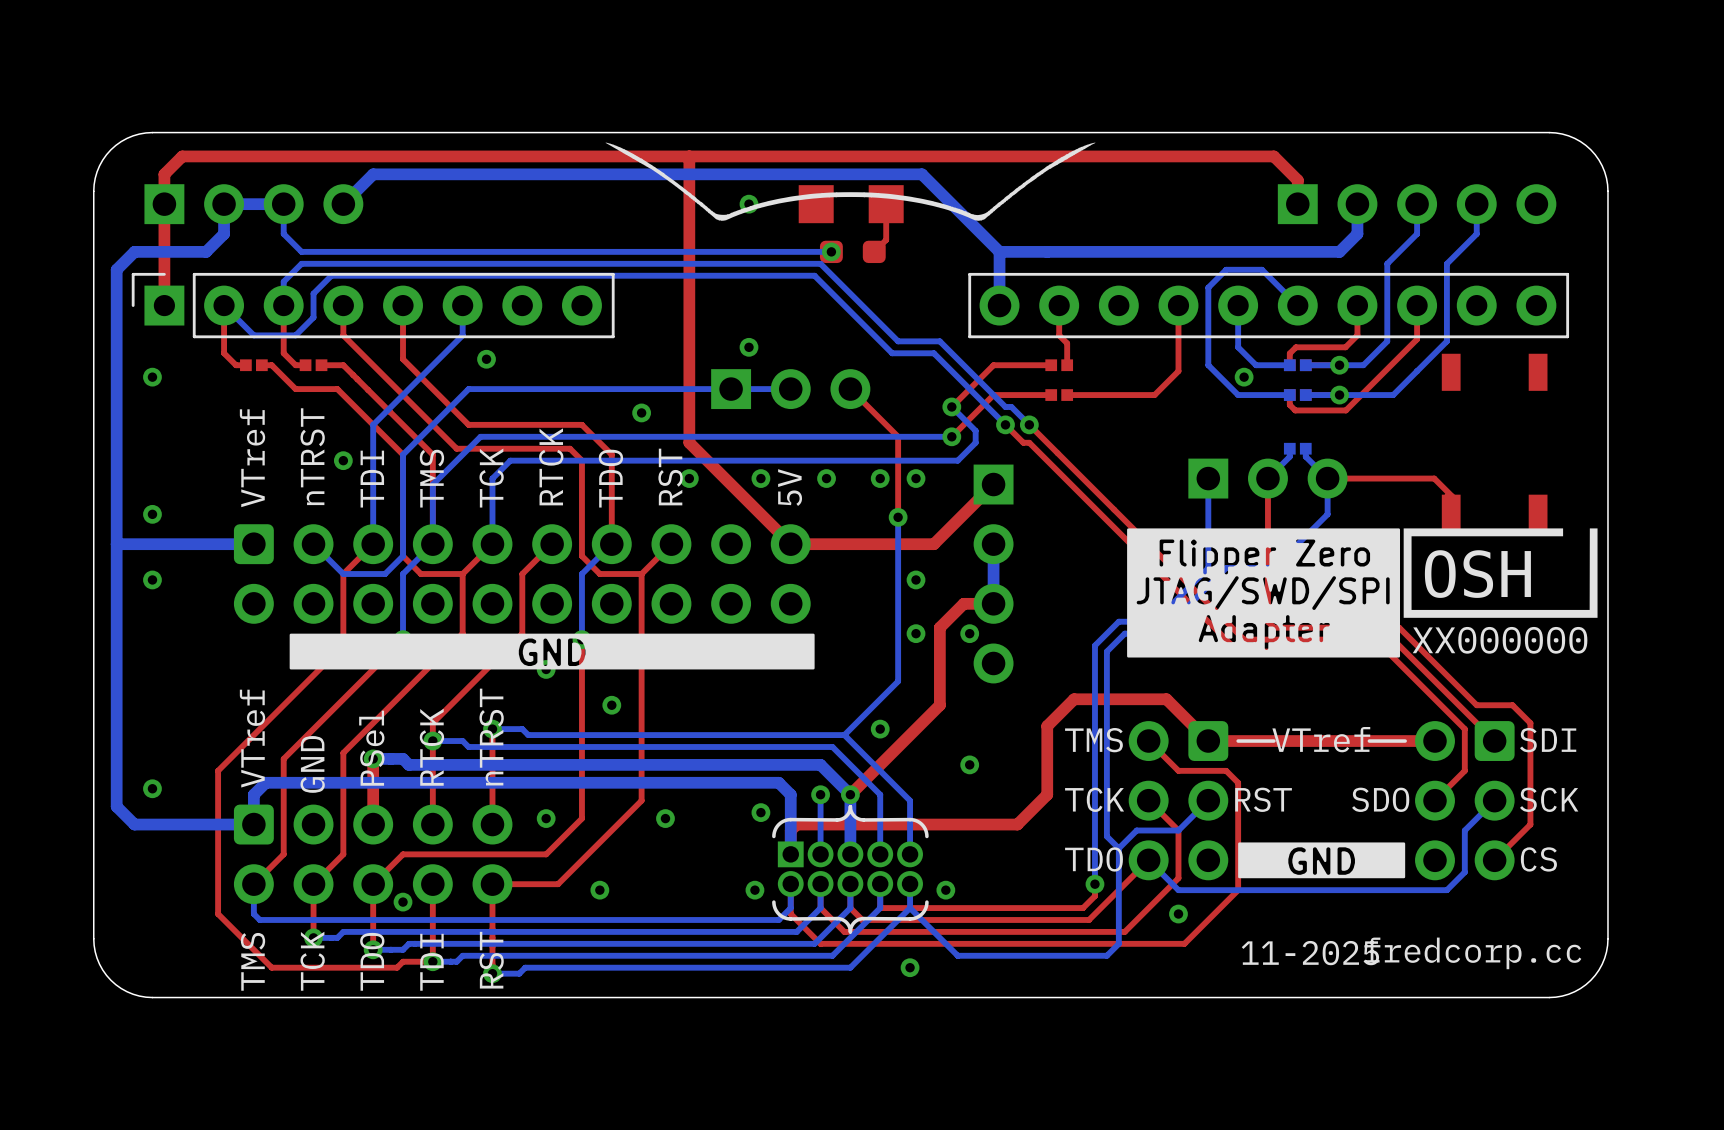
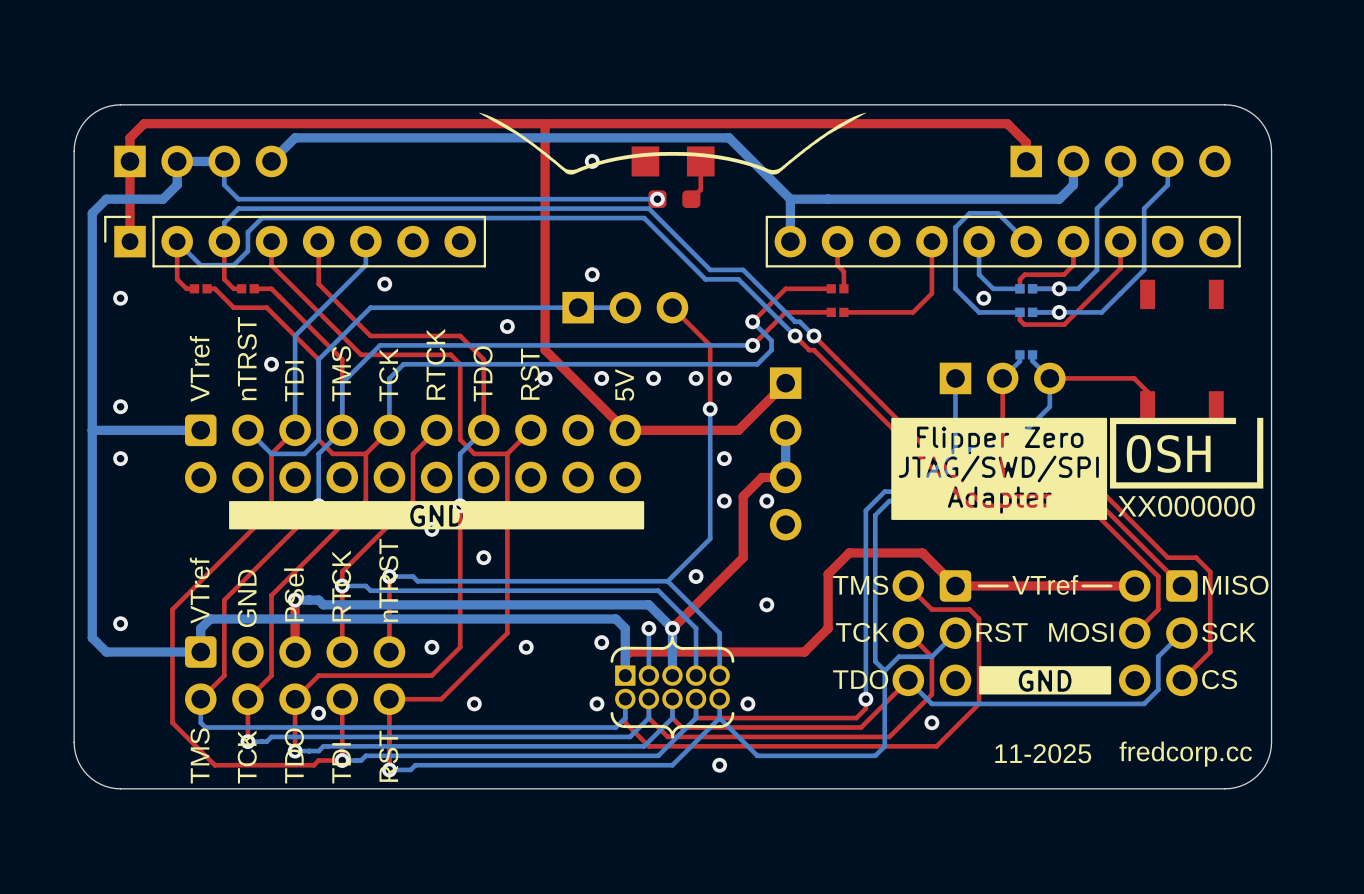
text: SDI (1548, 740) -> MISO (1235, 585)
text: SDO (1380, 799) -> MOSI (1081, 632)

